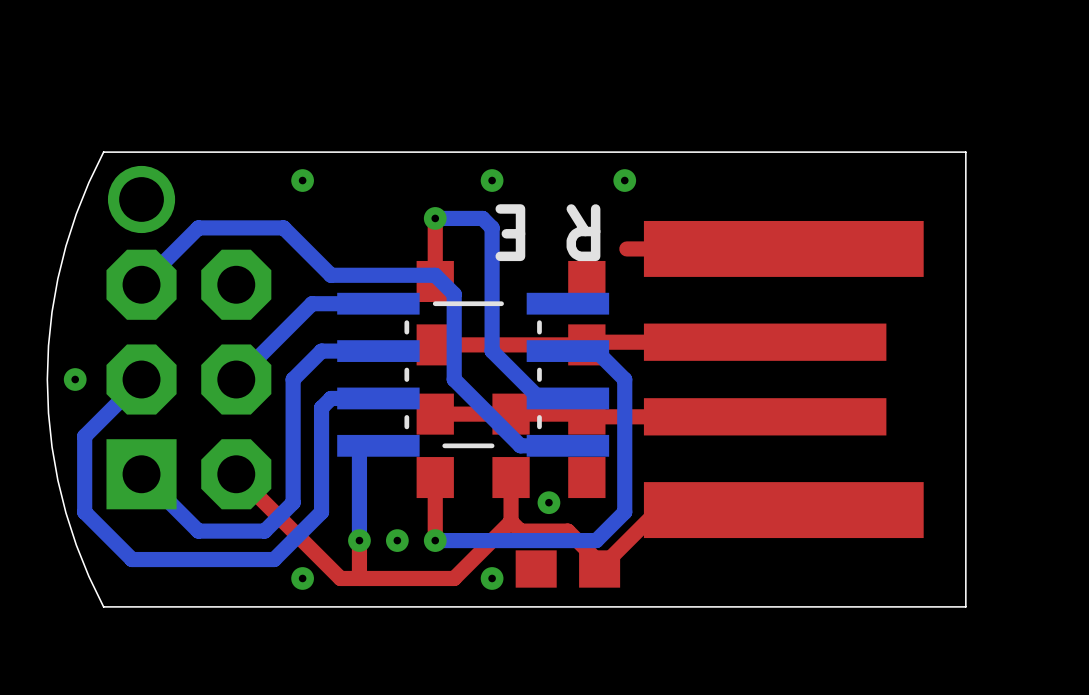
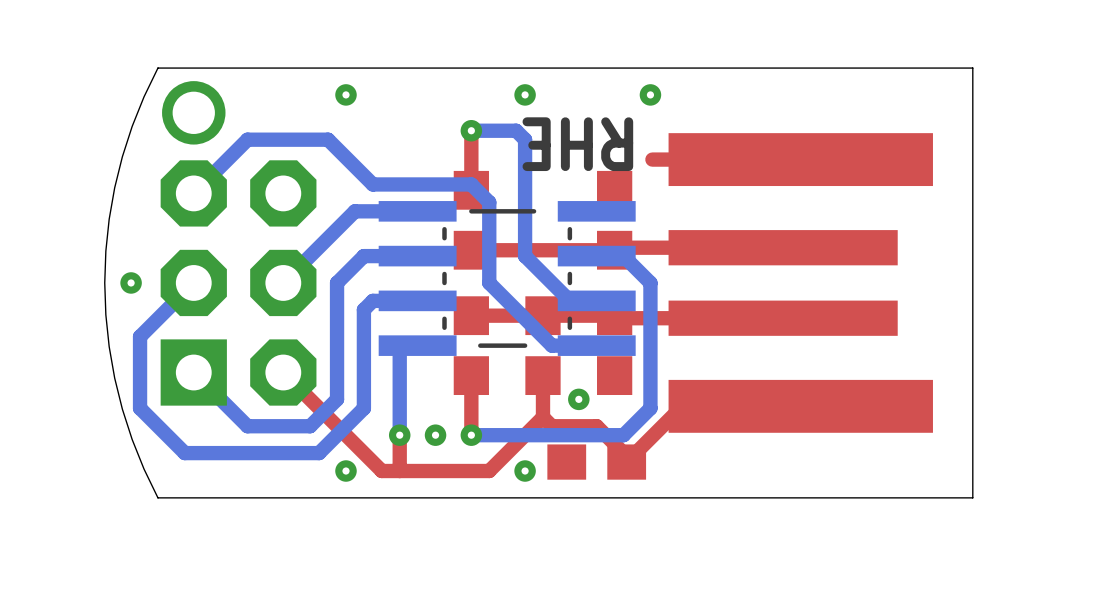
text: R E (547, 232) -> RHE (577, 144)

